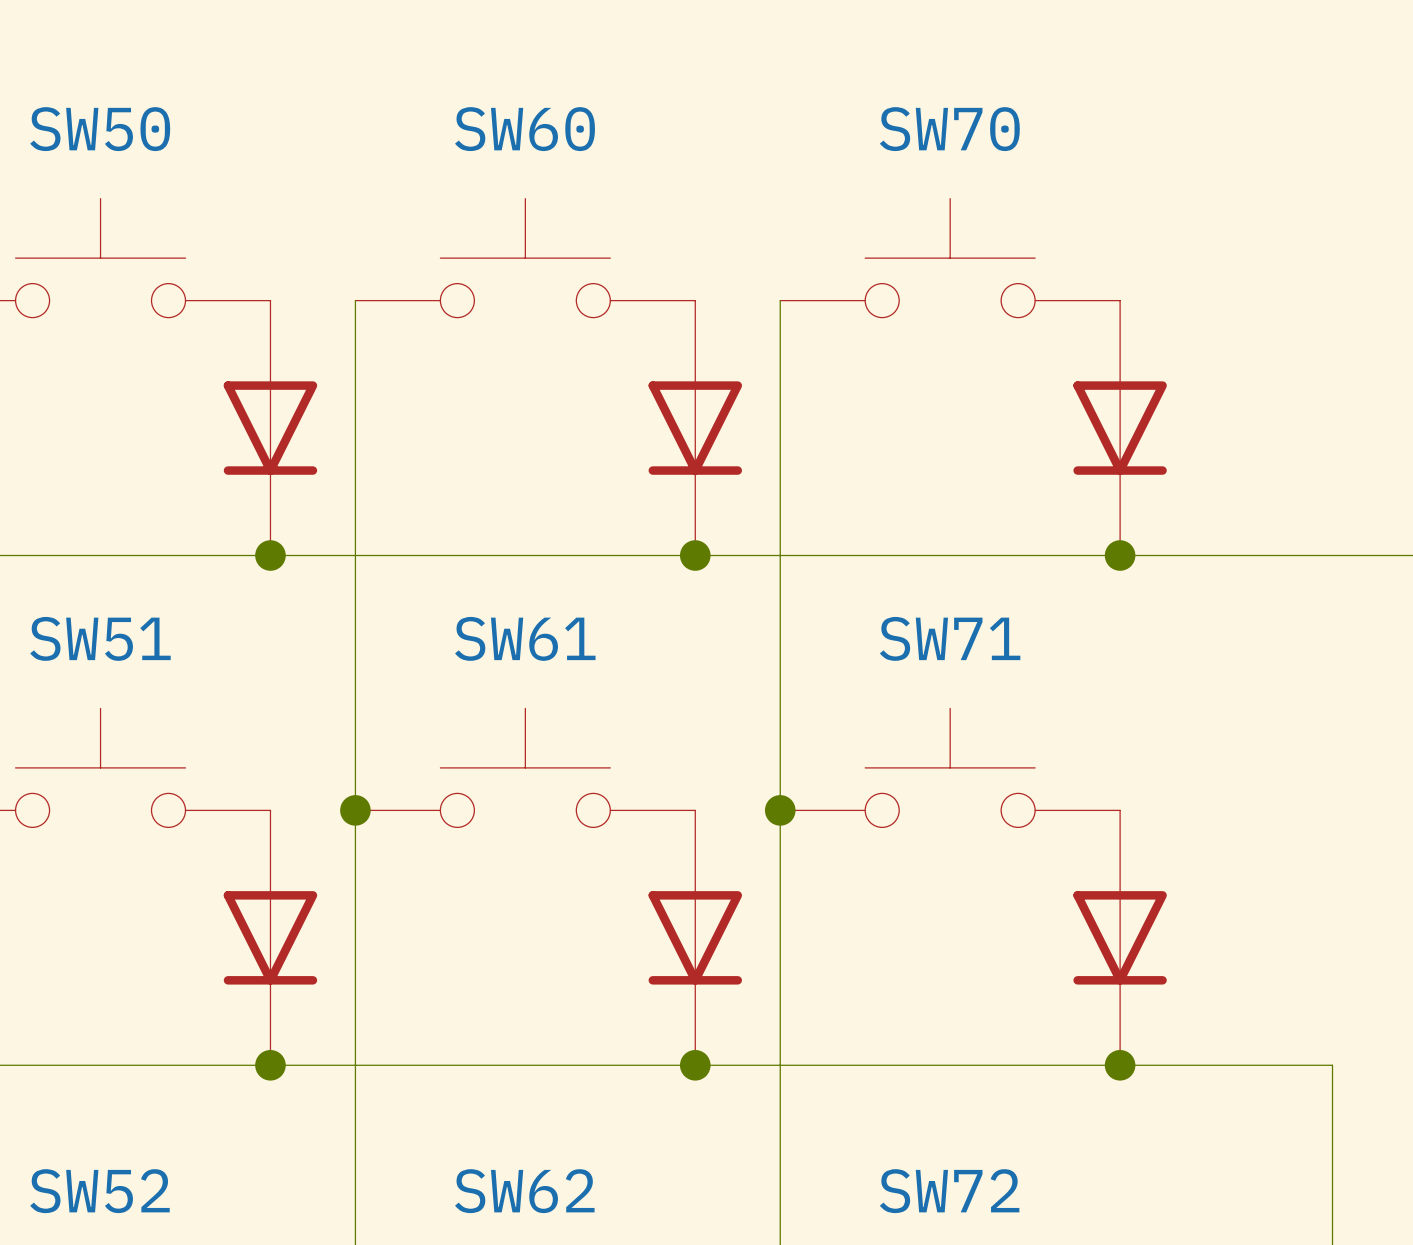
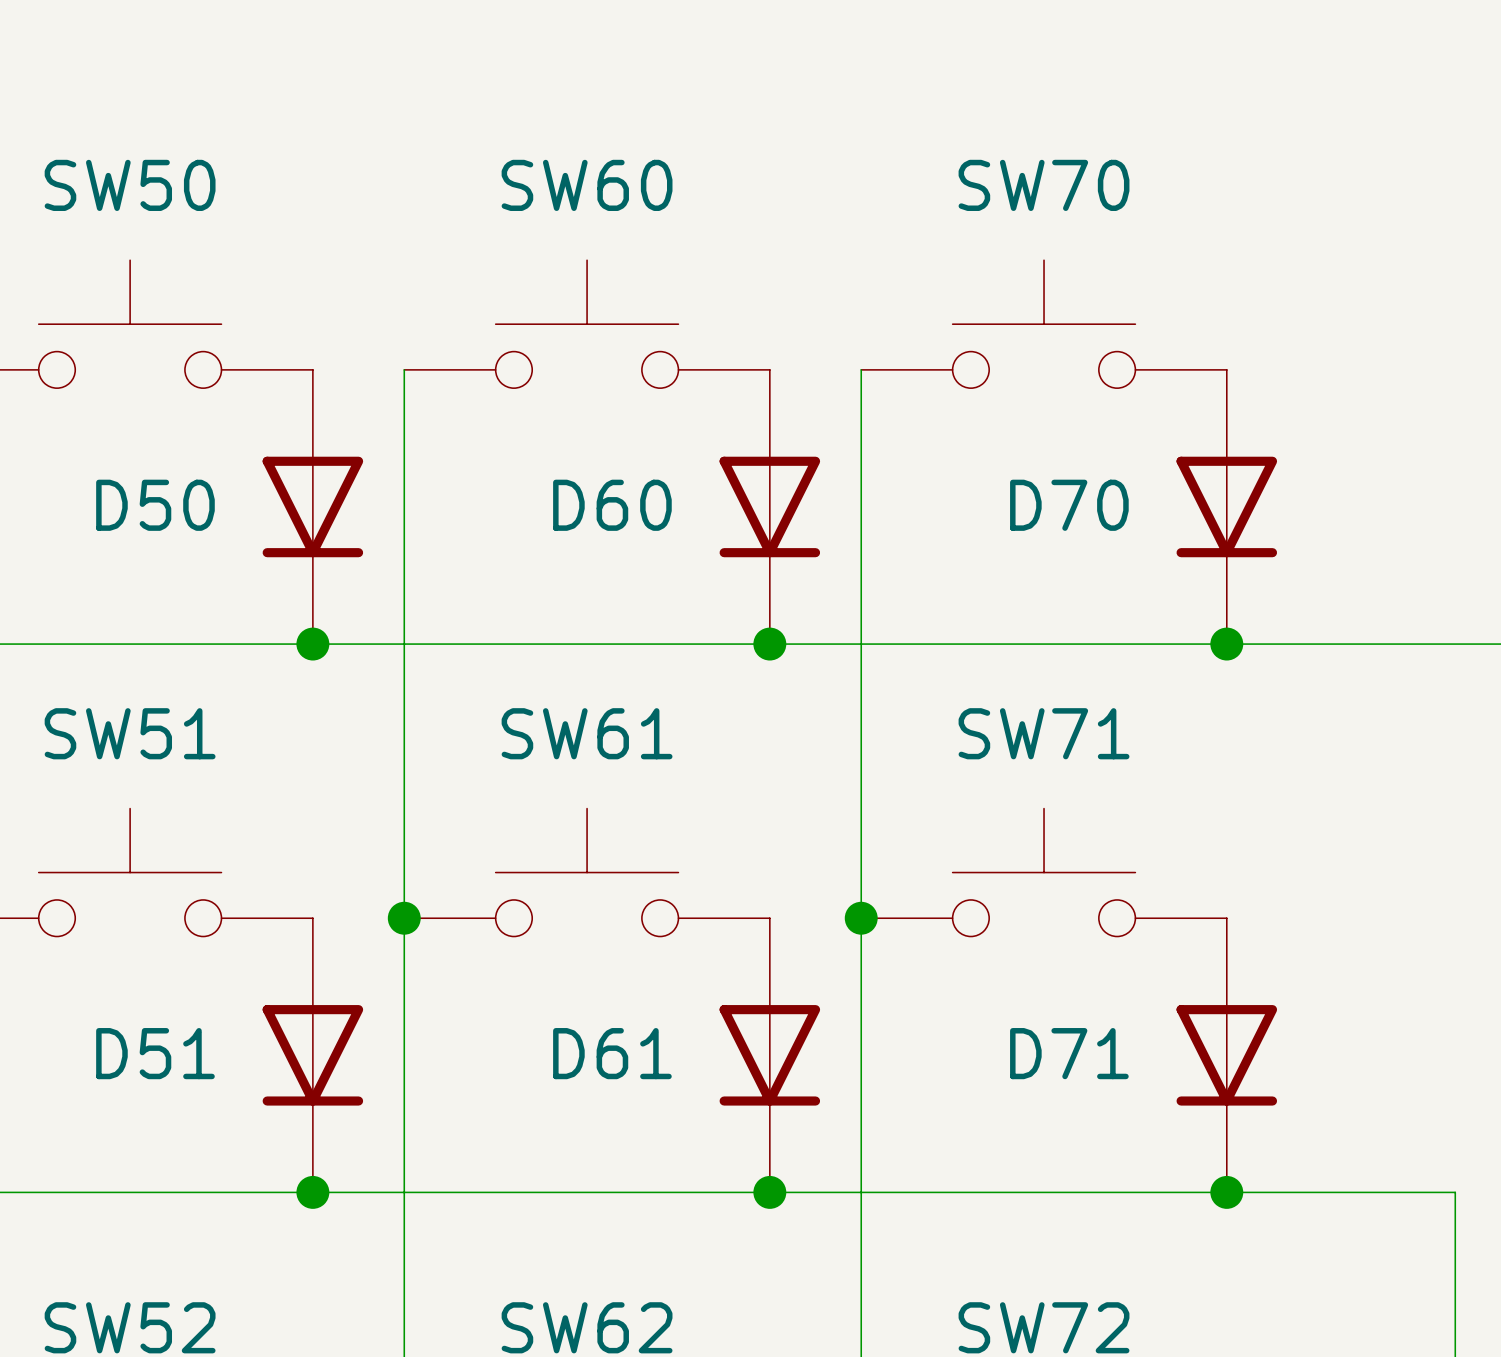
D50 name: none -> D50 (155, 505)
D60 name: none -> D60 (612, 505)
D70 name: none -> D70 (1069, 505)
D51 name: none -> D51 (155, 1053)
D61 name: none -> D61 (612, 1053)
D71 name: none -> D71 (1069, 1053)

